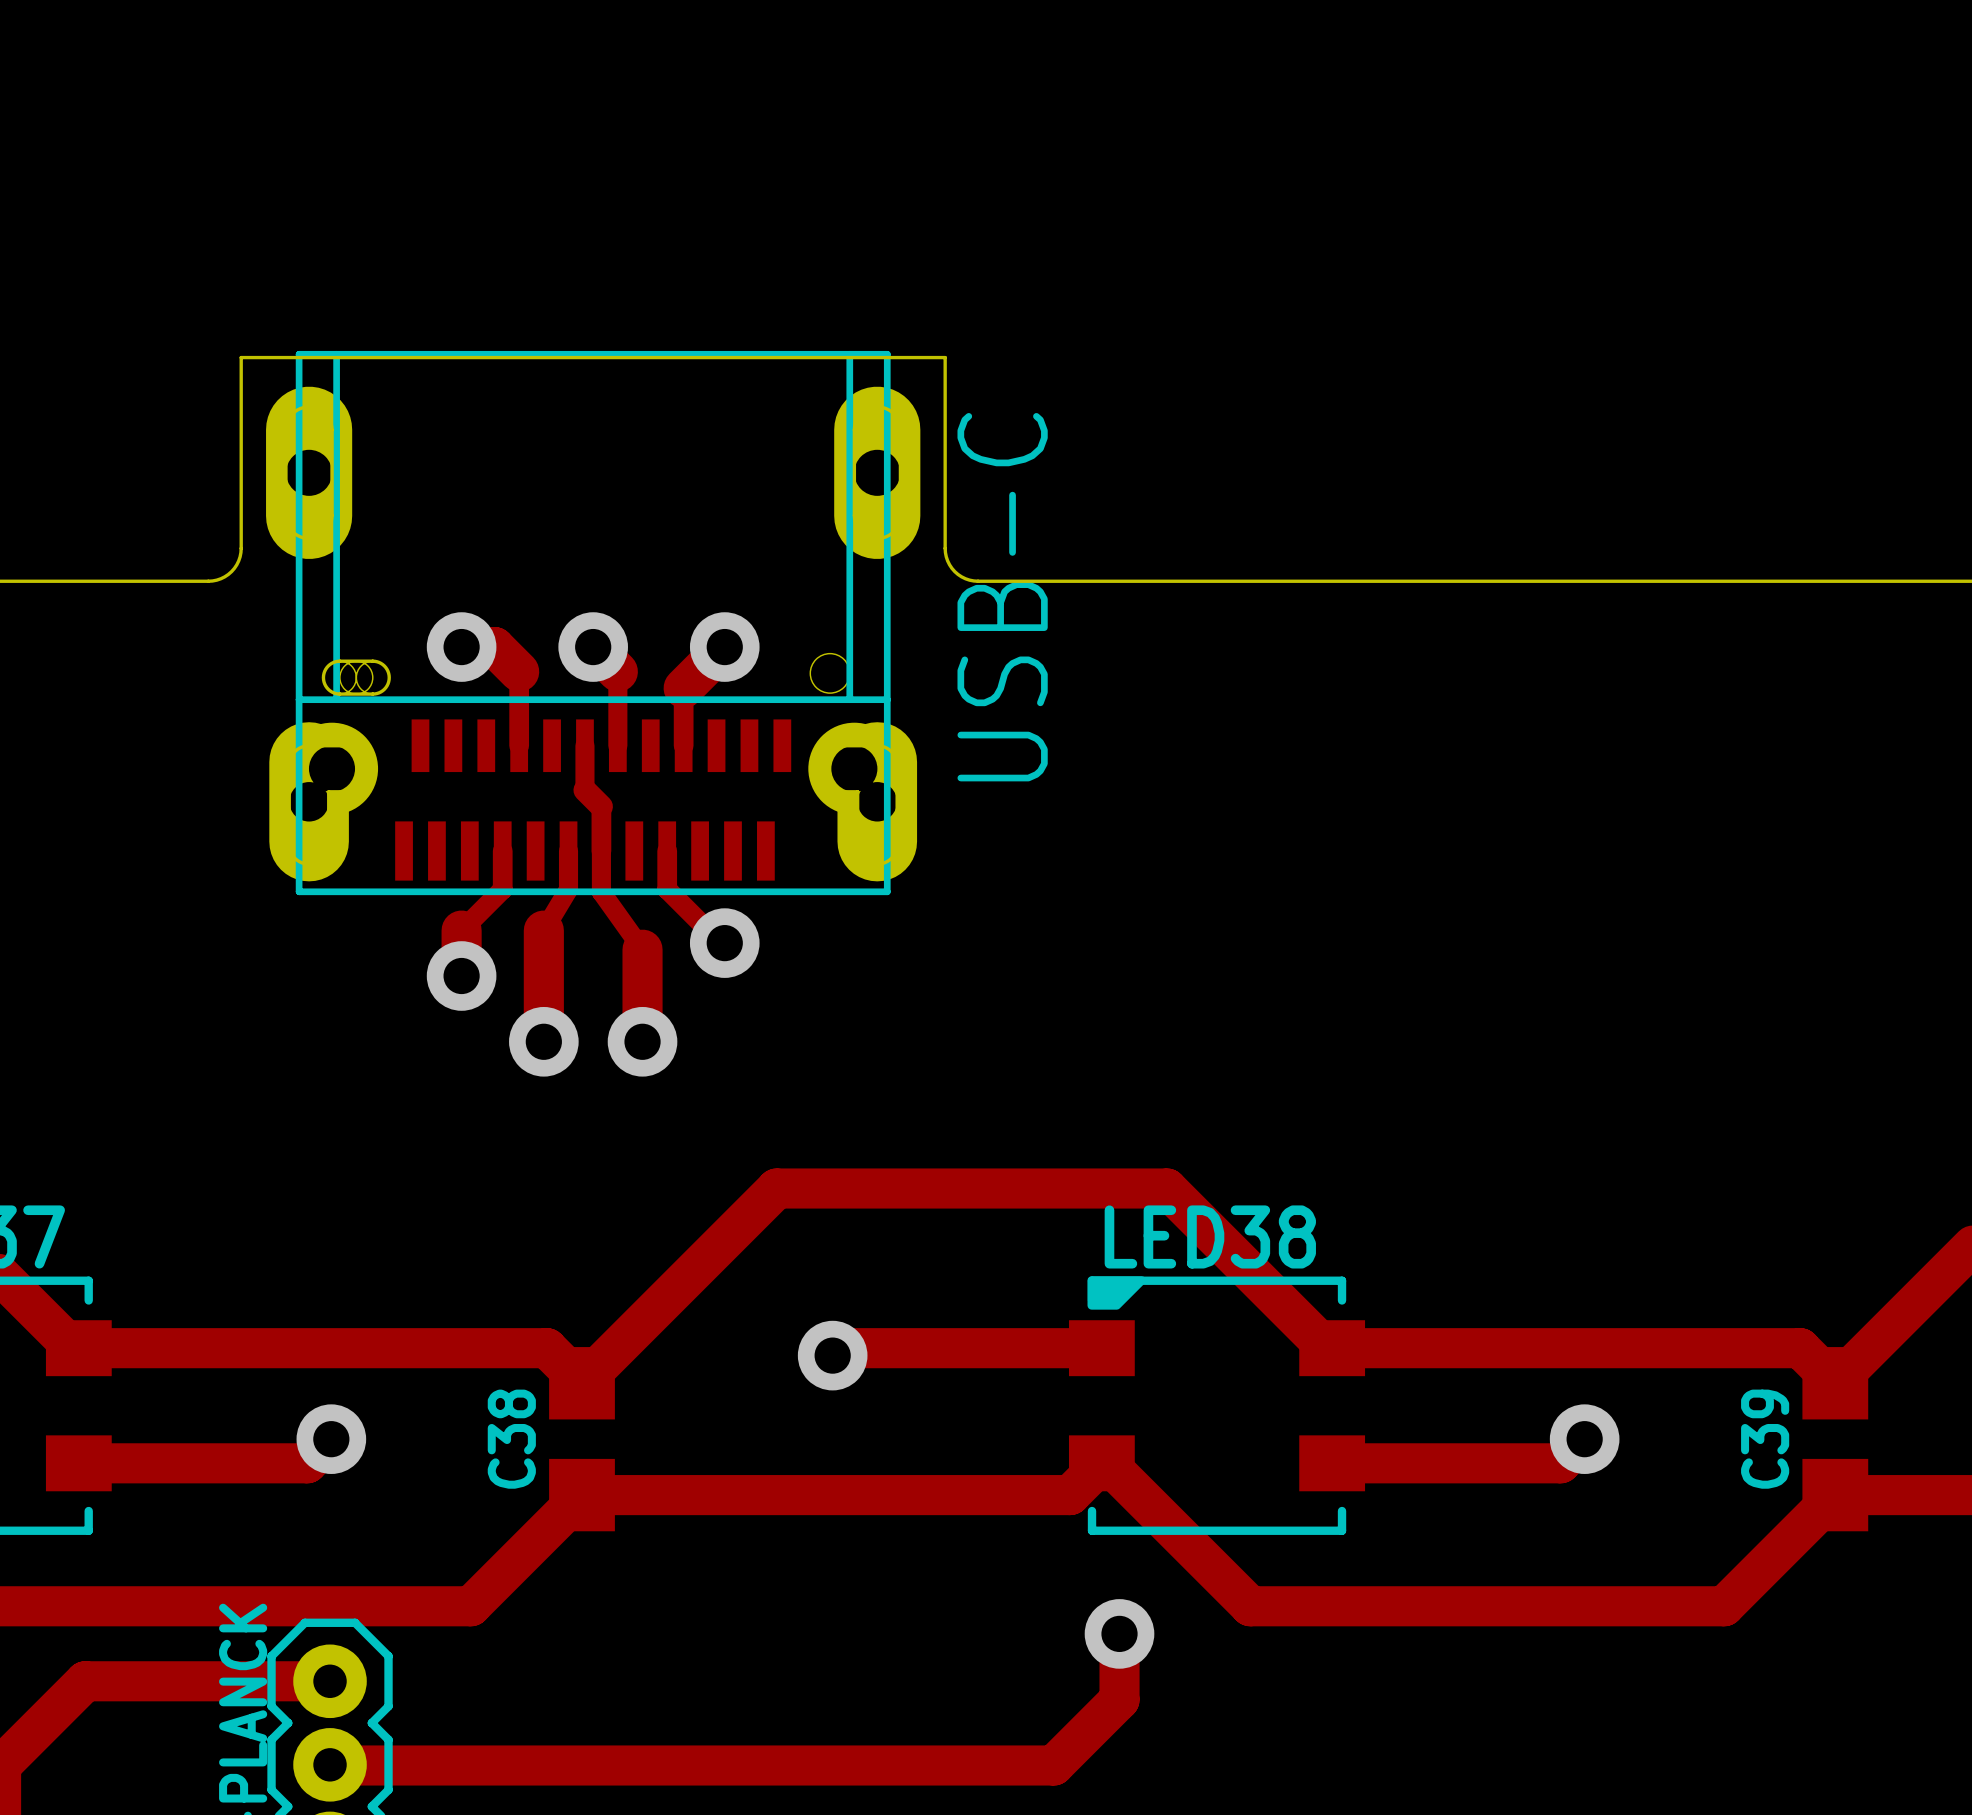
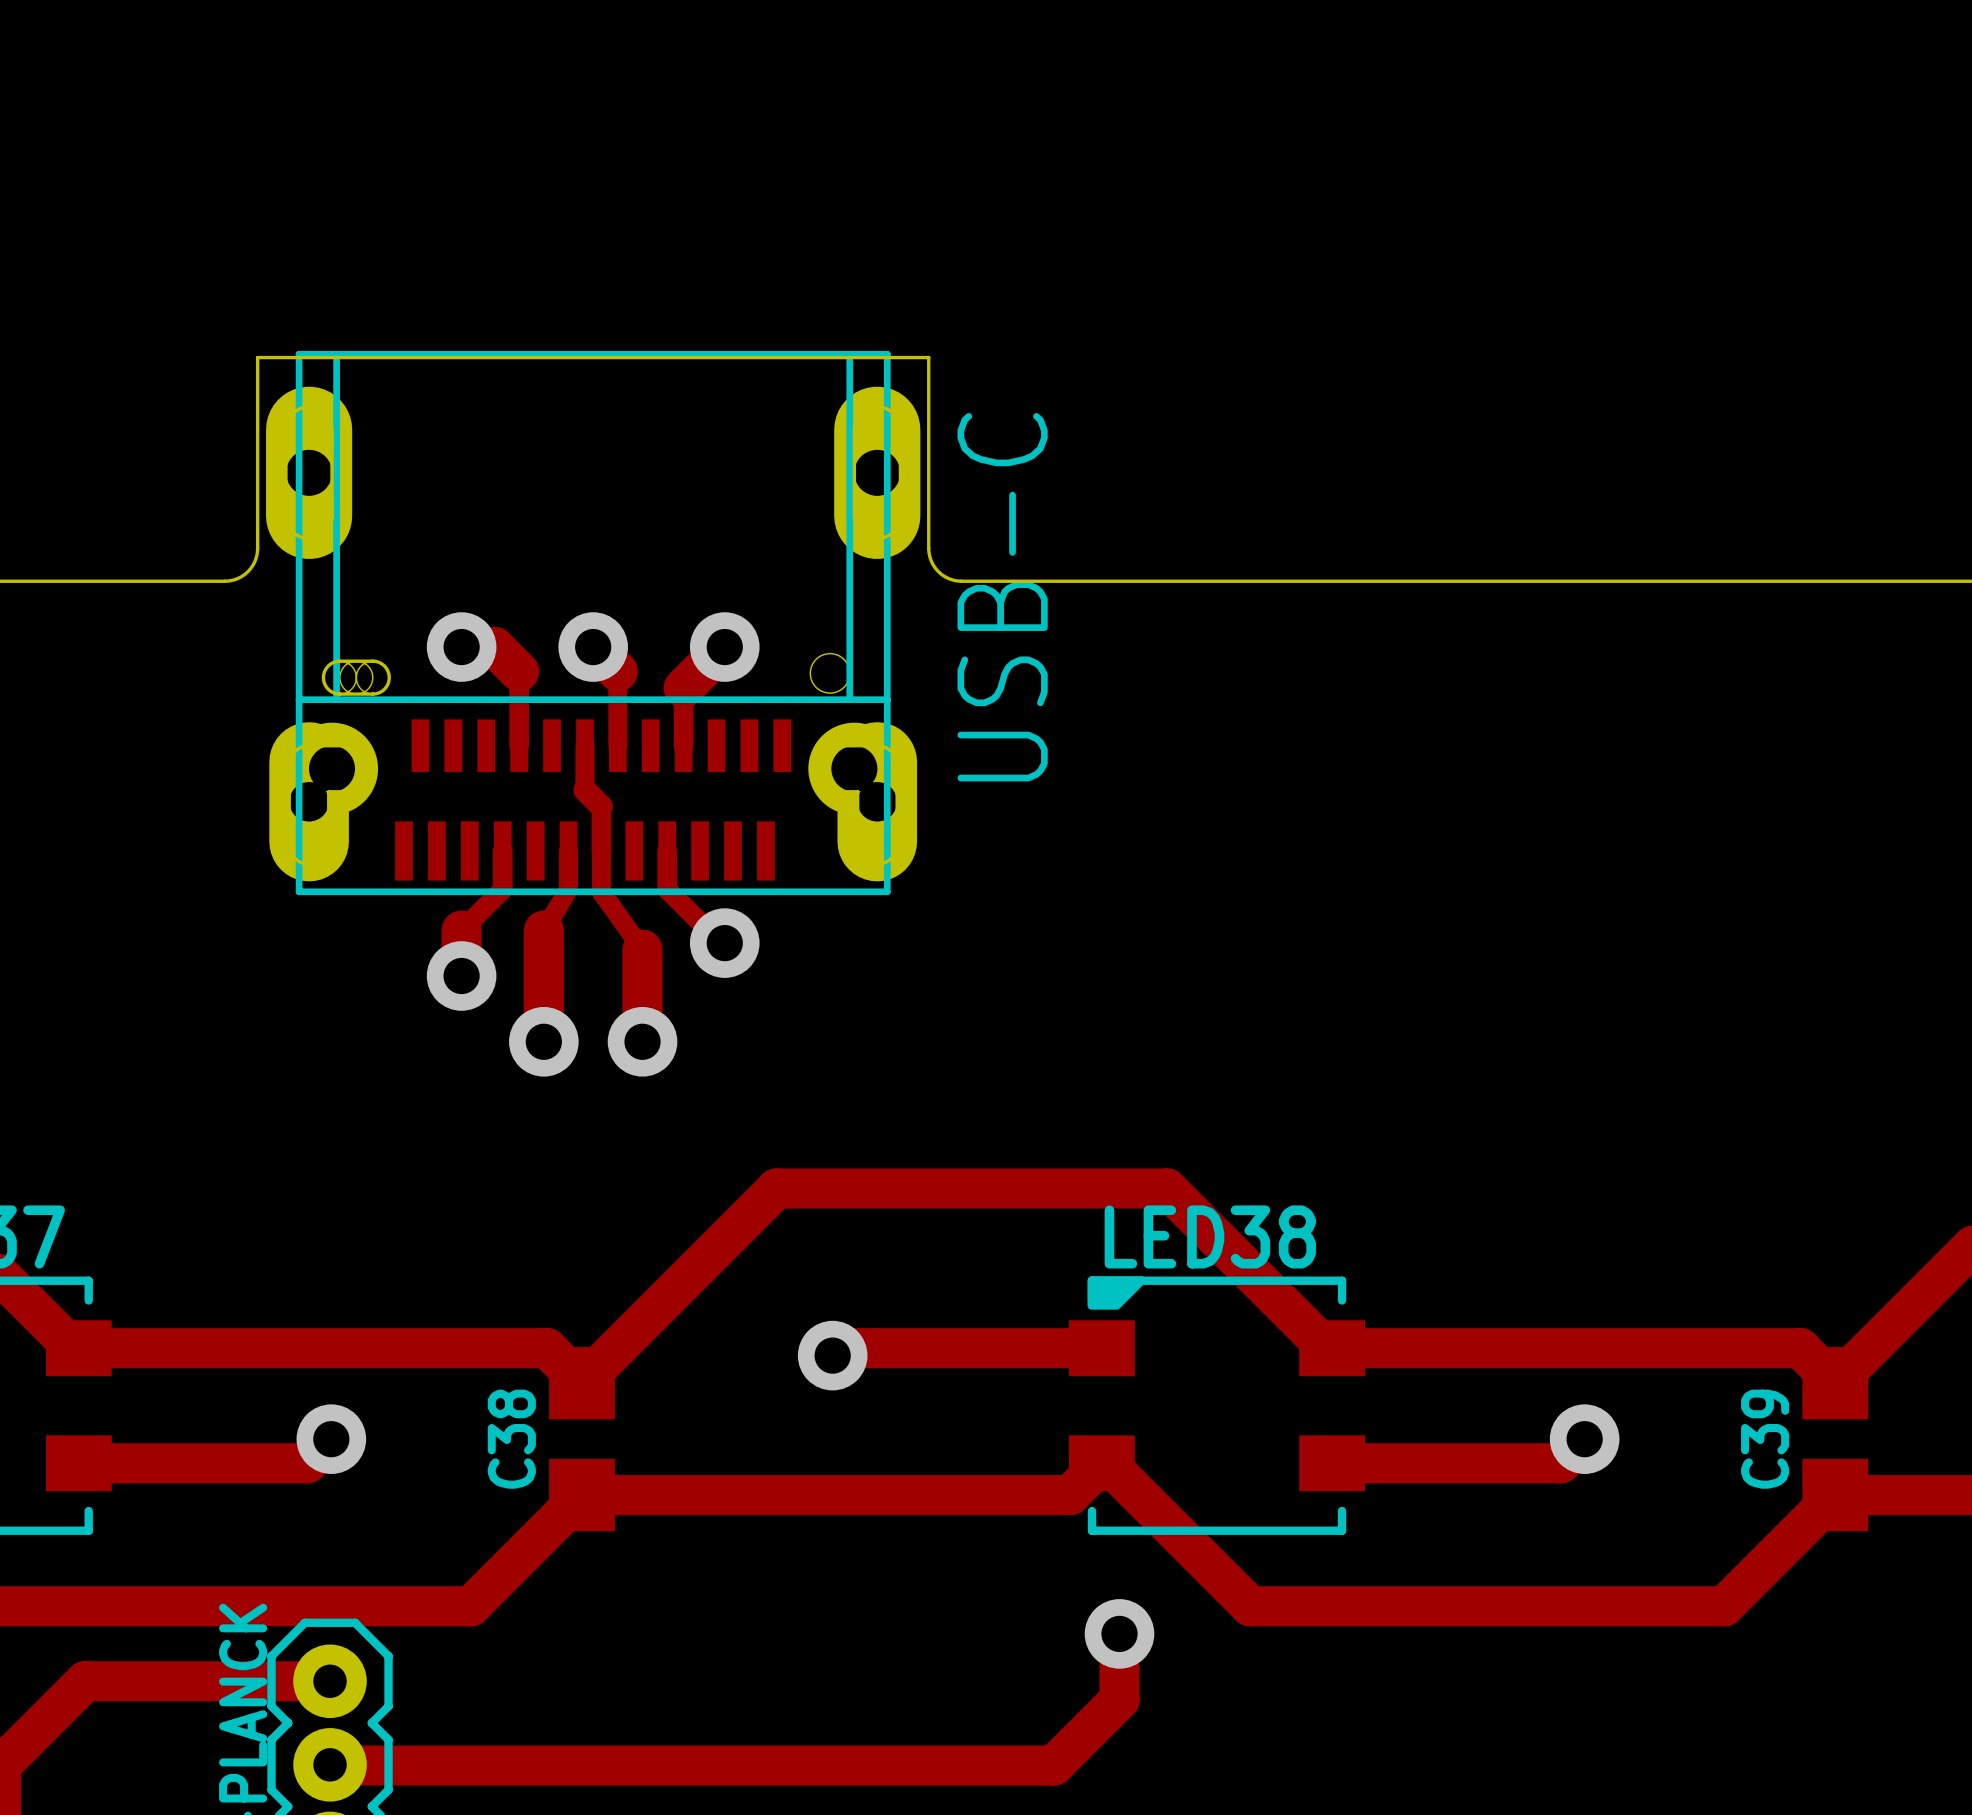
board edge: (257, 357) (241, 357) (240, 556) (234, 568) (228, 574) (216, 580) (208, 581) -> (257, 357) (256, 556) (250, 568) (241, 576) (229, 580) (208, 581)
board edge: (928, 357) (945, 357) (946, 556) (951, 568) (958, 574) (969, 580) (978, 581) -> (928, 357) (929, 556) (935, 568) (945, 576) (957, 580) (978, 581)

